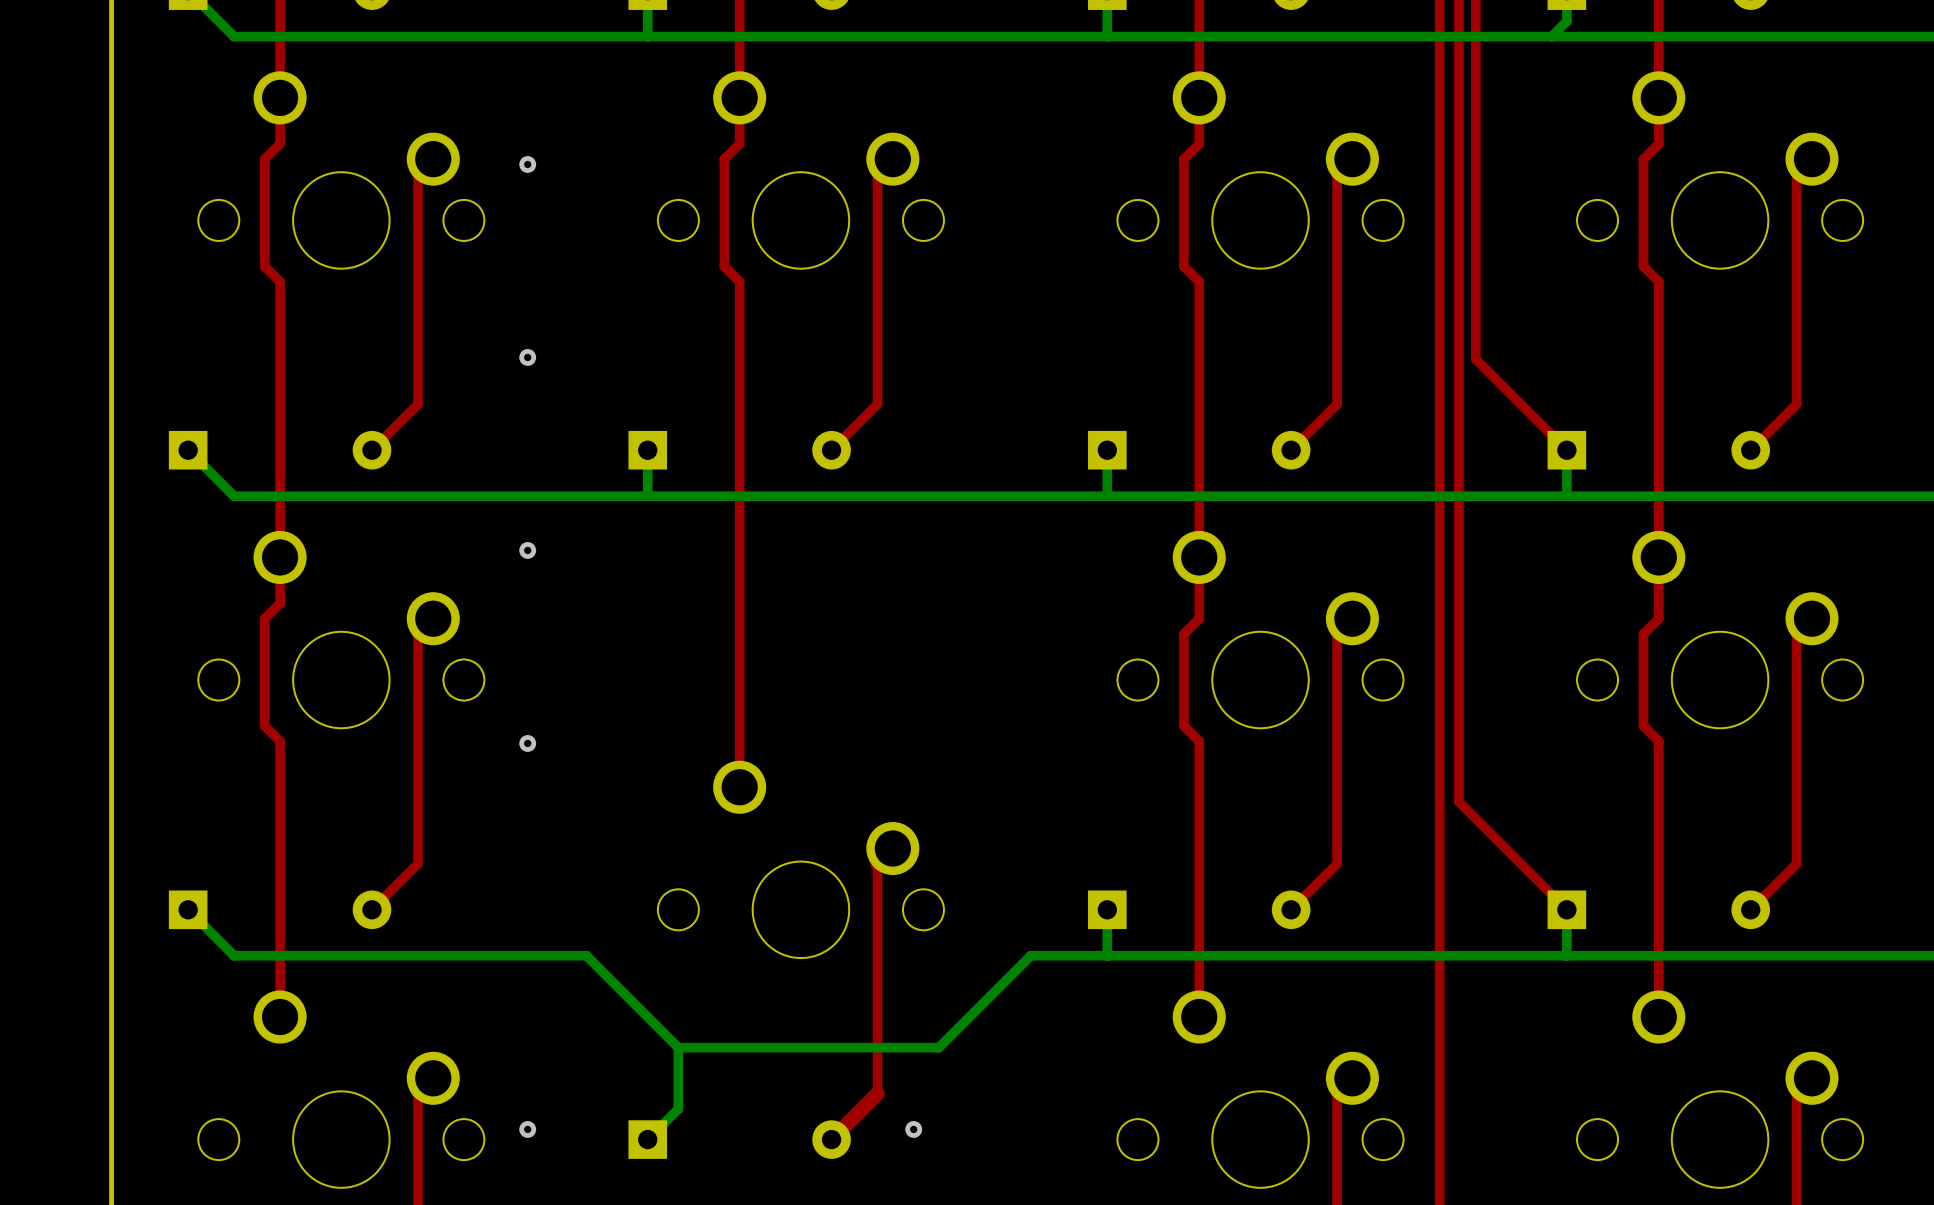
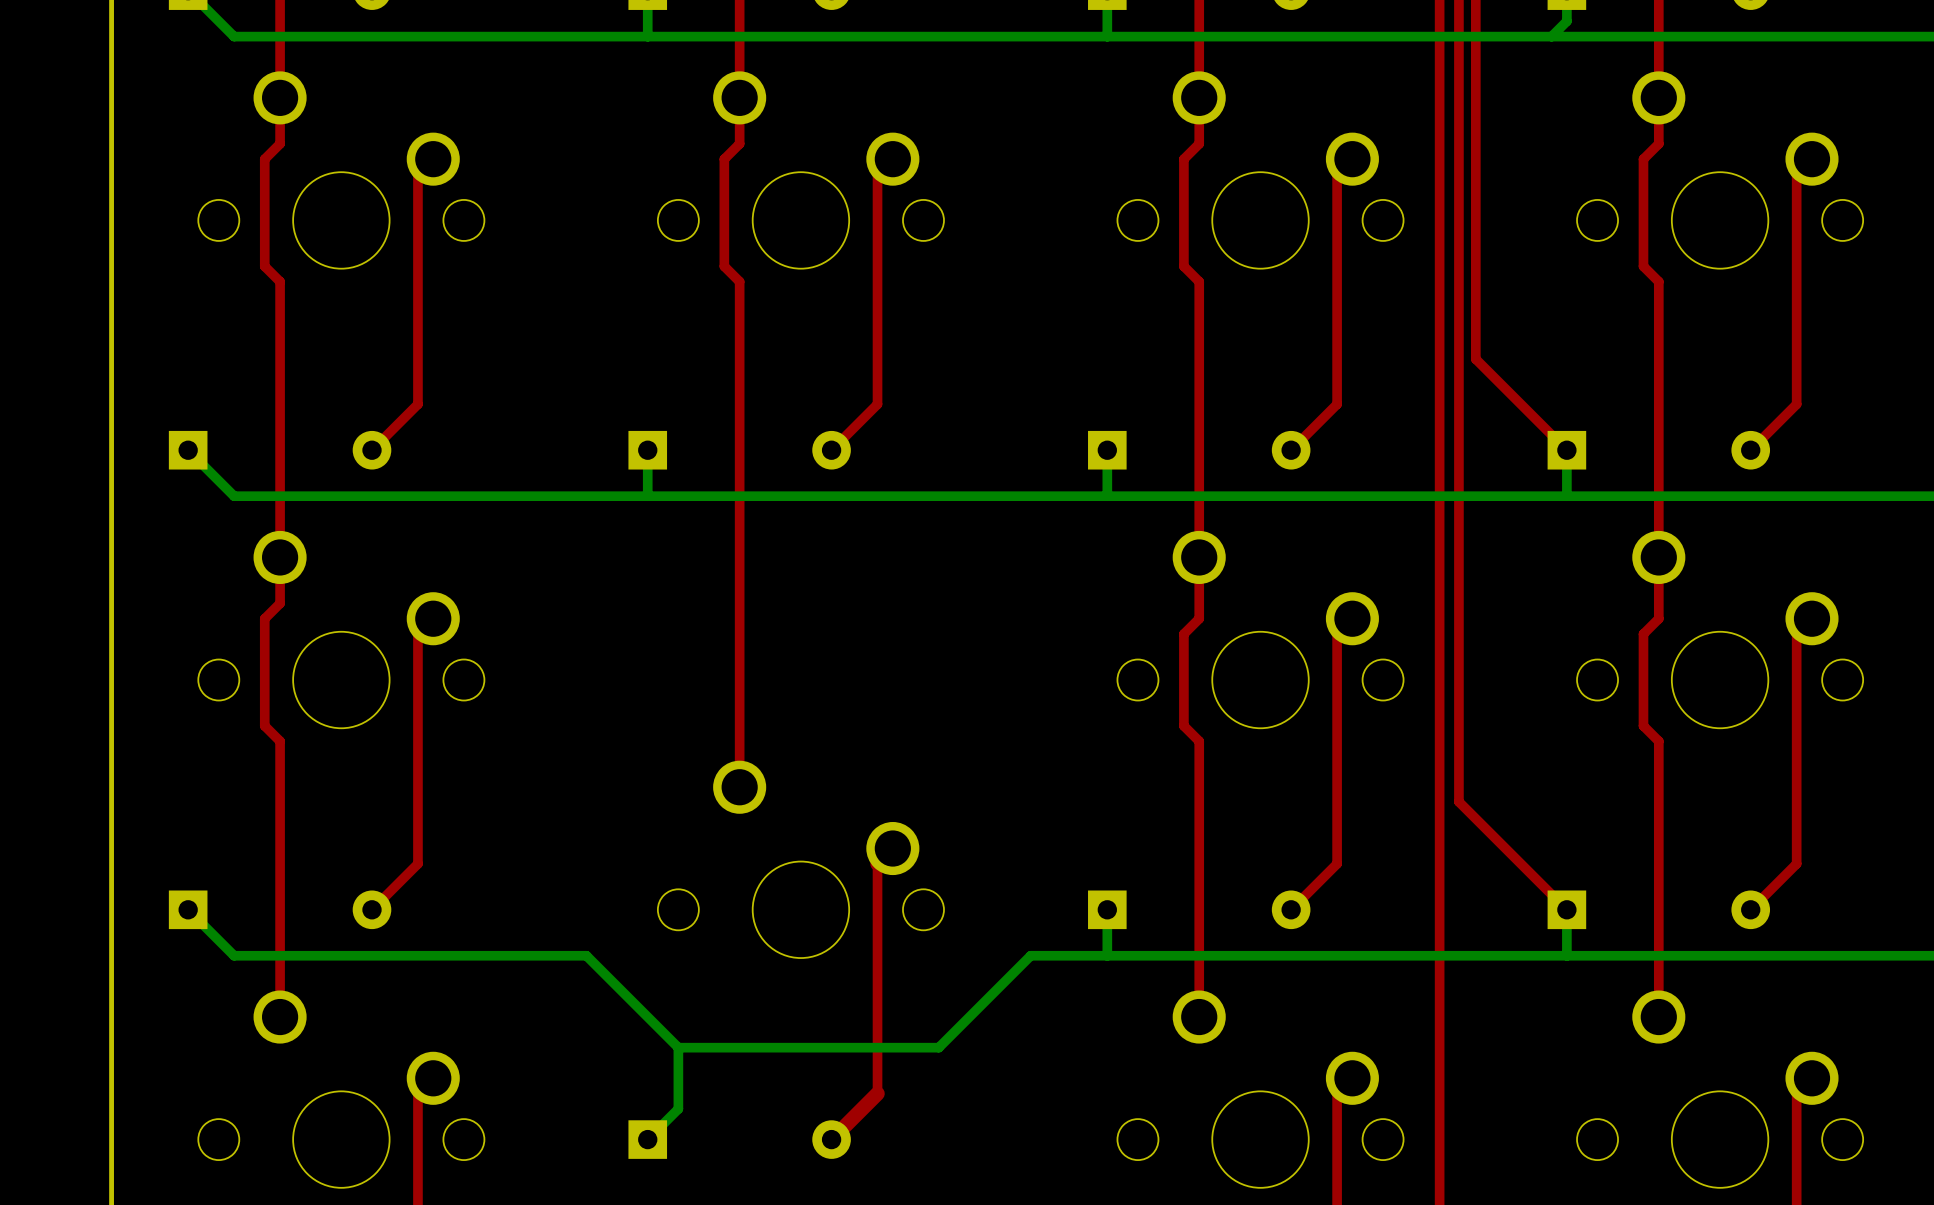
via: (527, 164) -> none
via: (527, 357) -> none
via: (527, 550) -> none
via: (527, 743) -> none
via: (527, 1129) -> none
via: (913, 1129) -> none

